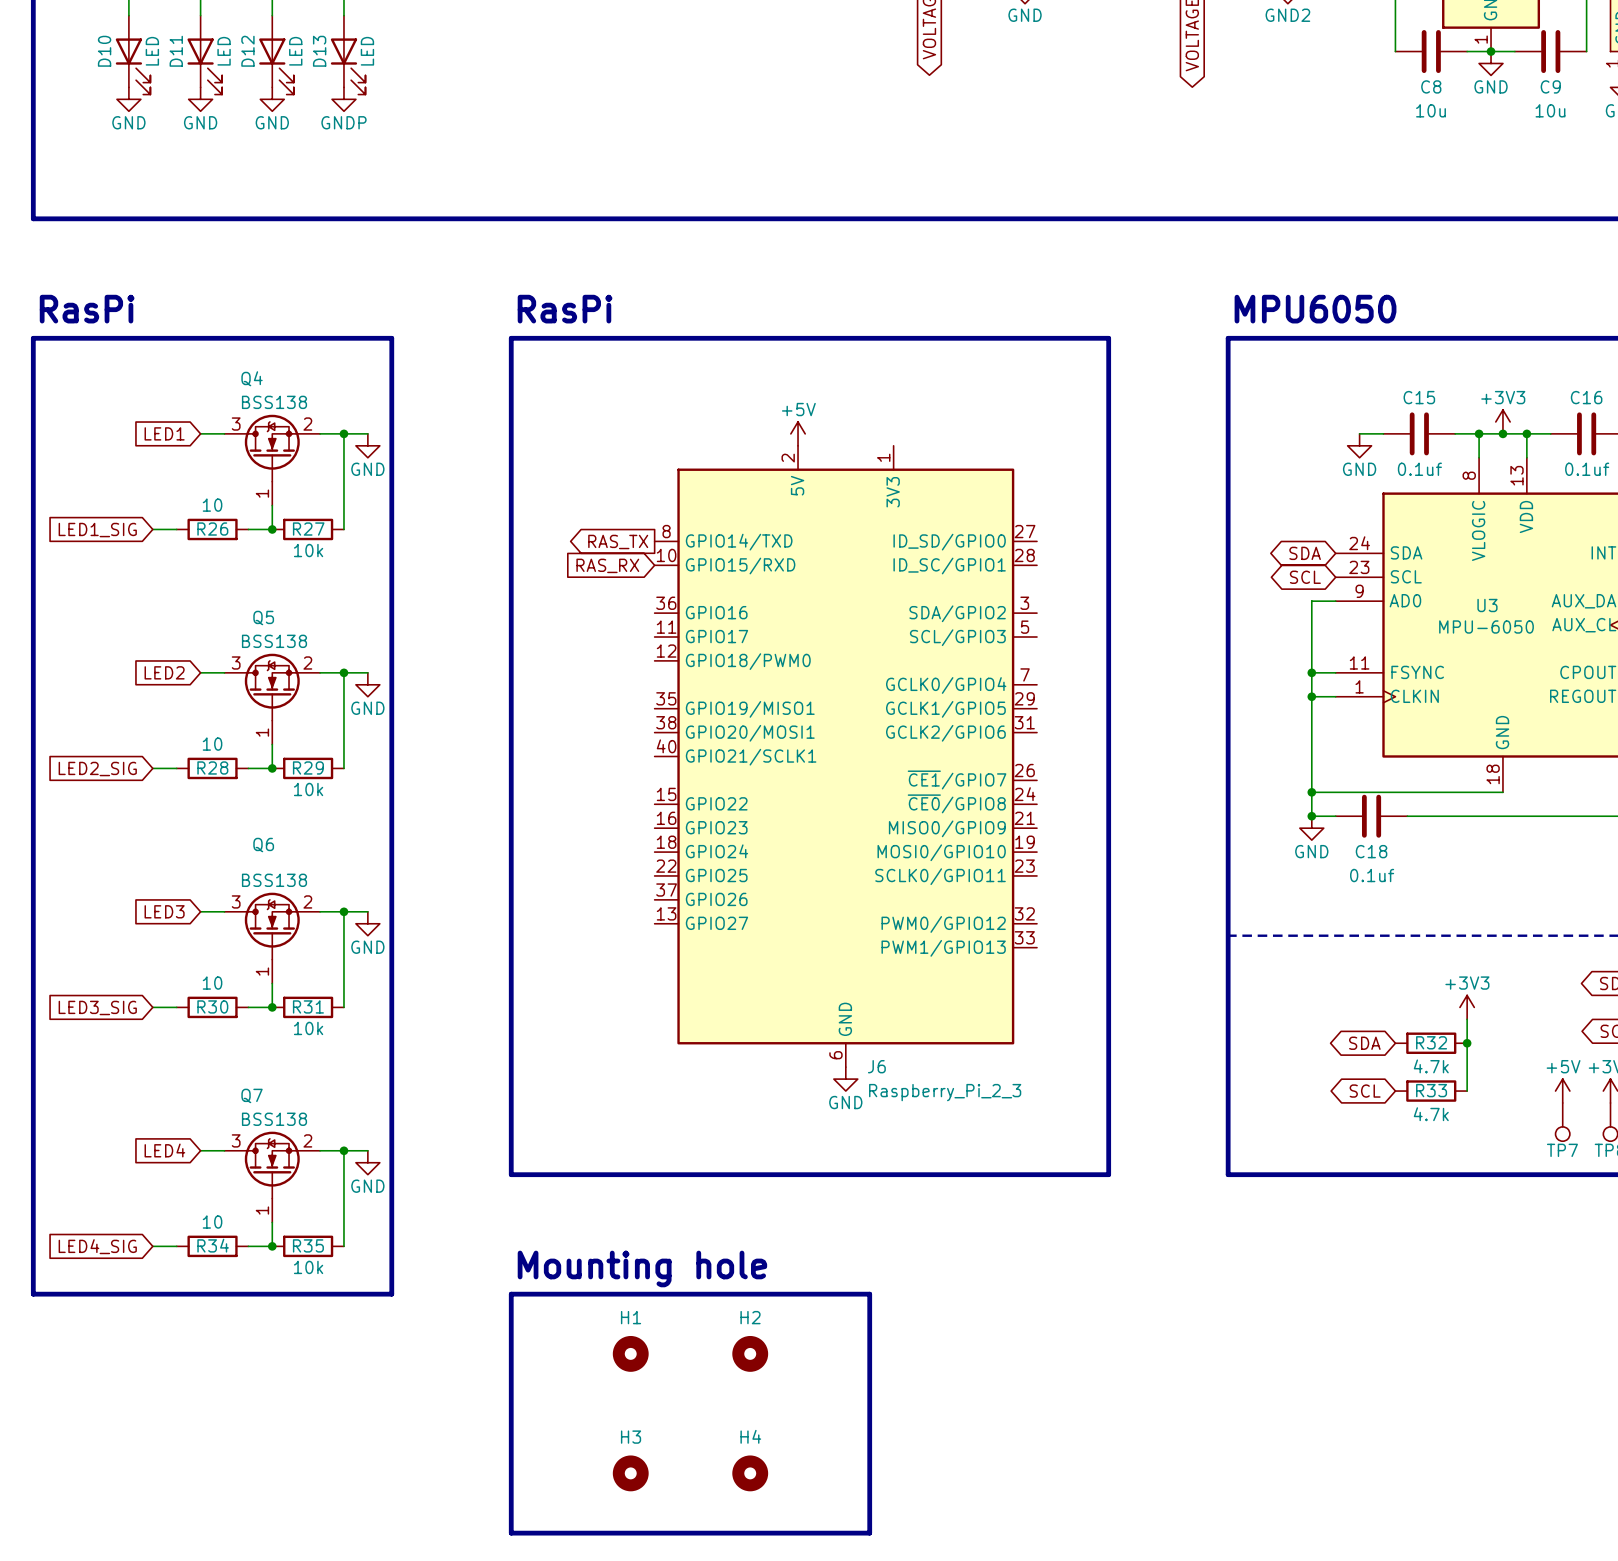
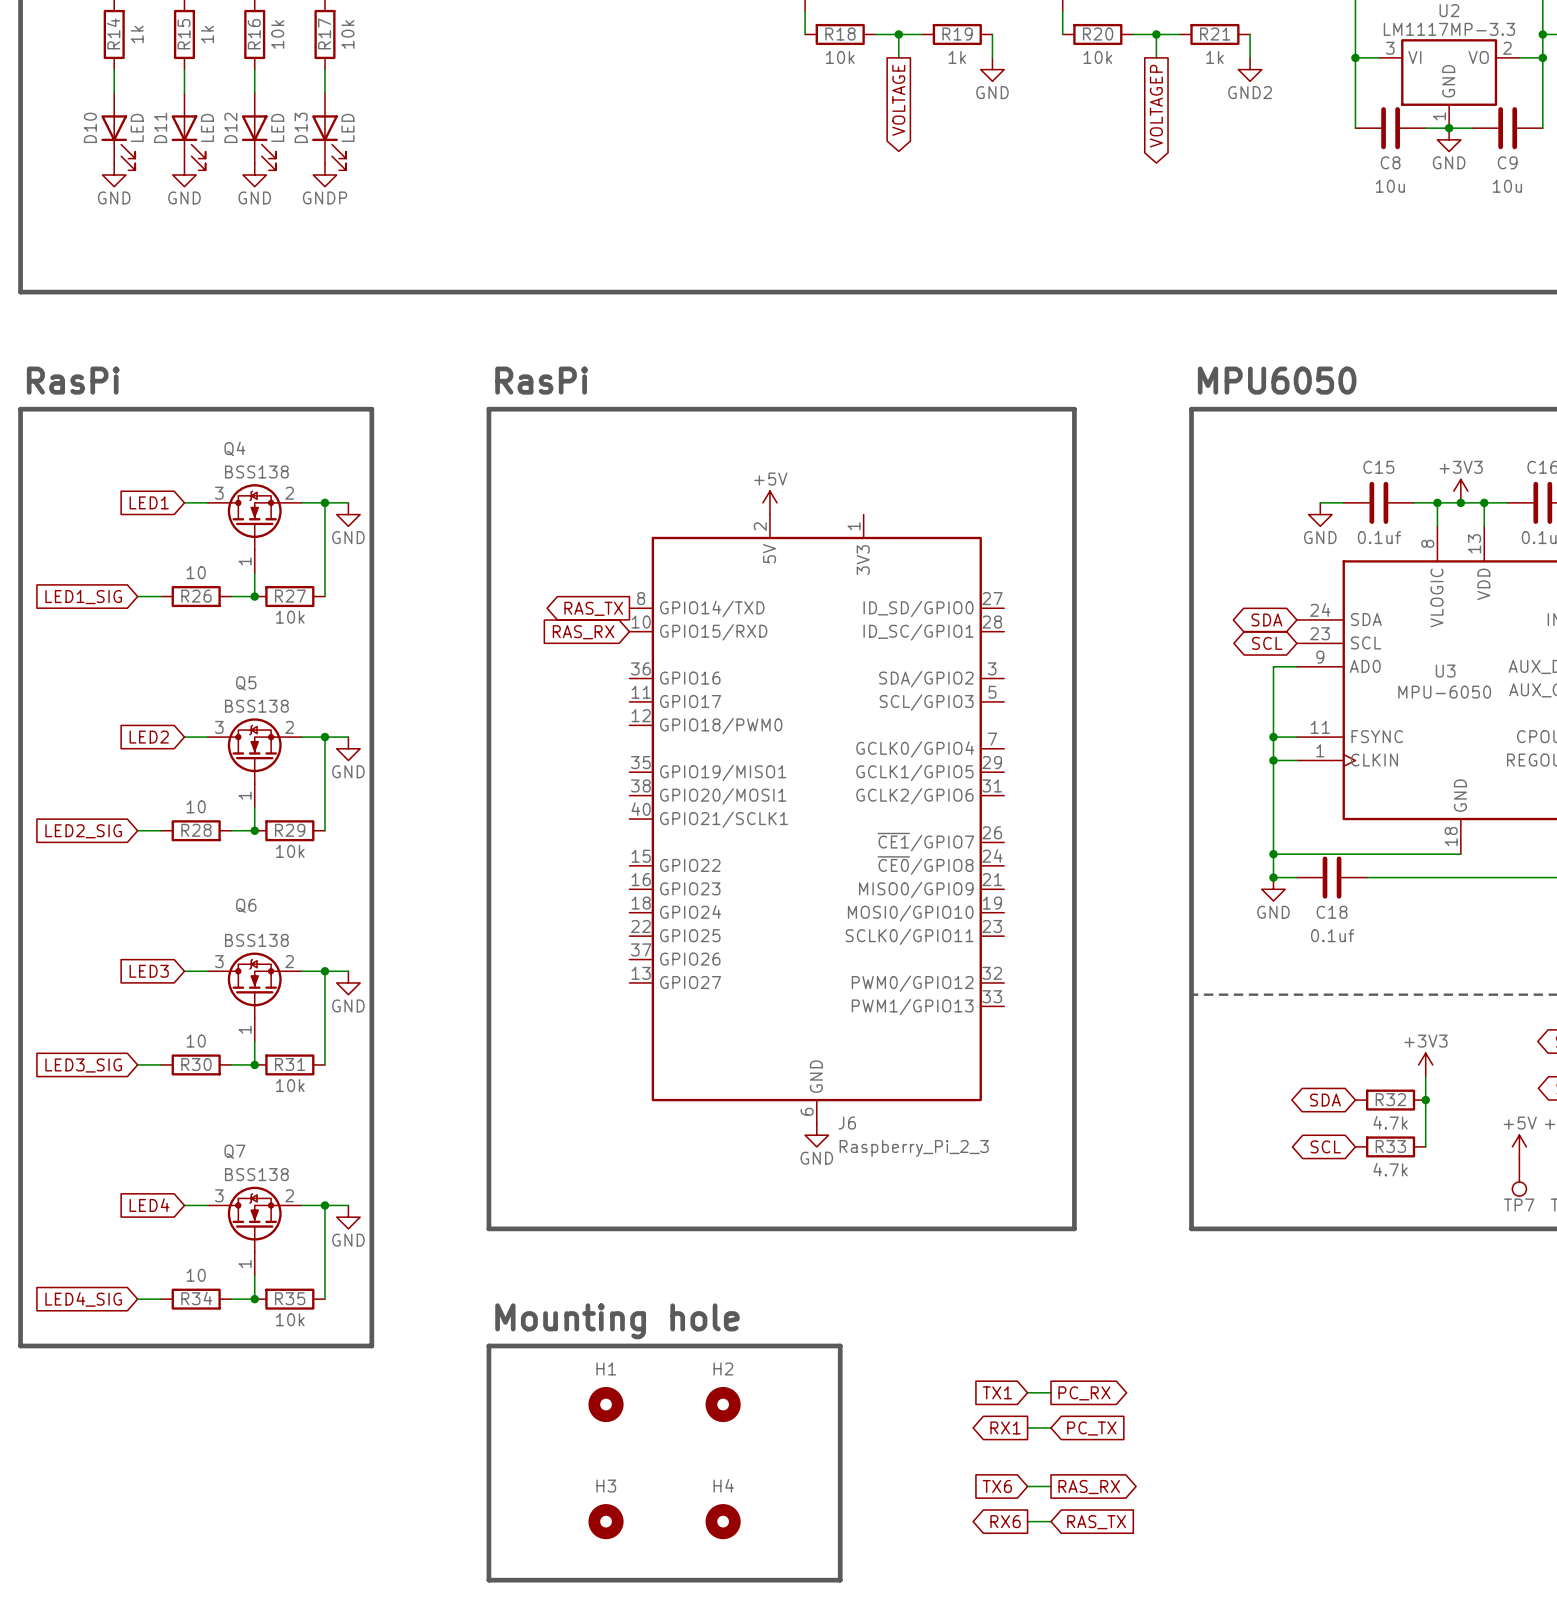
global label: none -> TX1 (997, 1392)
wire: none -> (1027, 1392) (1051, 1392)
global label: none -> PC_RX (1084, 1393)
global label: none -> RX1 (1005, 1427)
wire: none -> (1027, 1427) (1051, 1427)
global label: none -> PC_TX (1091, 1428)
global label: none -> TX6 (997, 1486)
wire: none -> (1027, 1486) (1051, 1486)
global label: none -> RAS_RX (1089, 1487)
global label: none -> RX6 (1005, 1521)
wire: none -> (1027, 1521) (1051, 1521)
global label: none -> RAS_TX (1096, 1522)

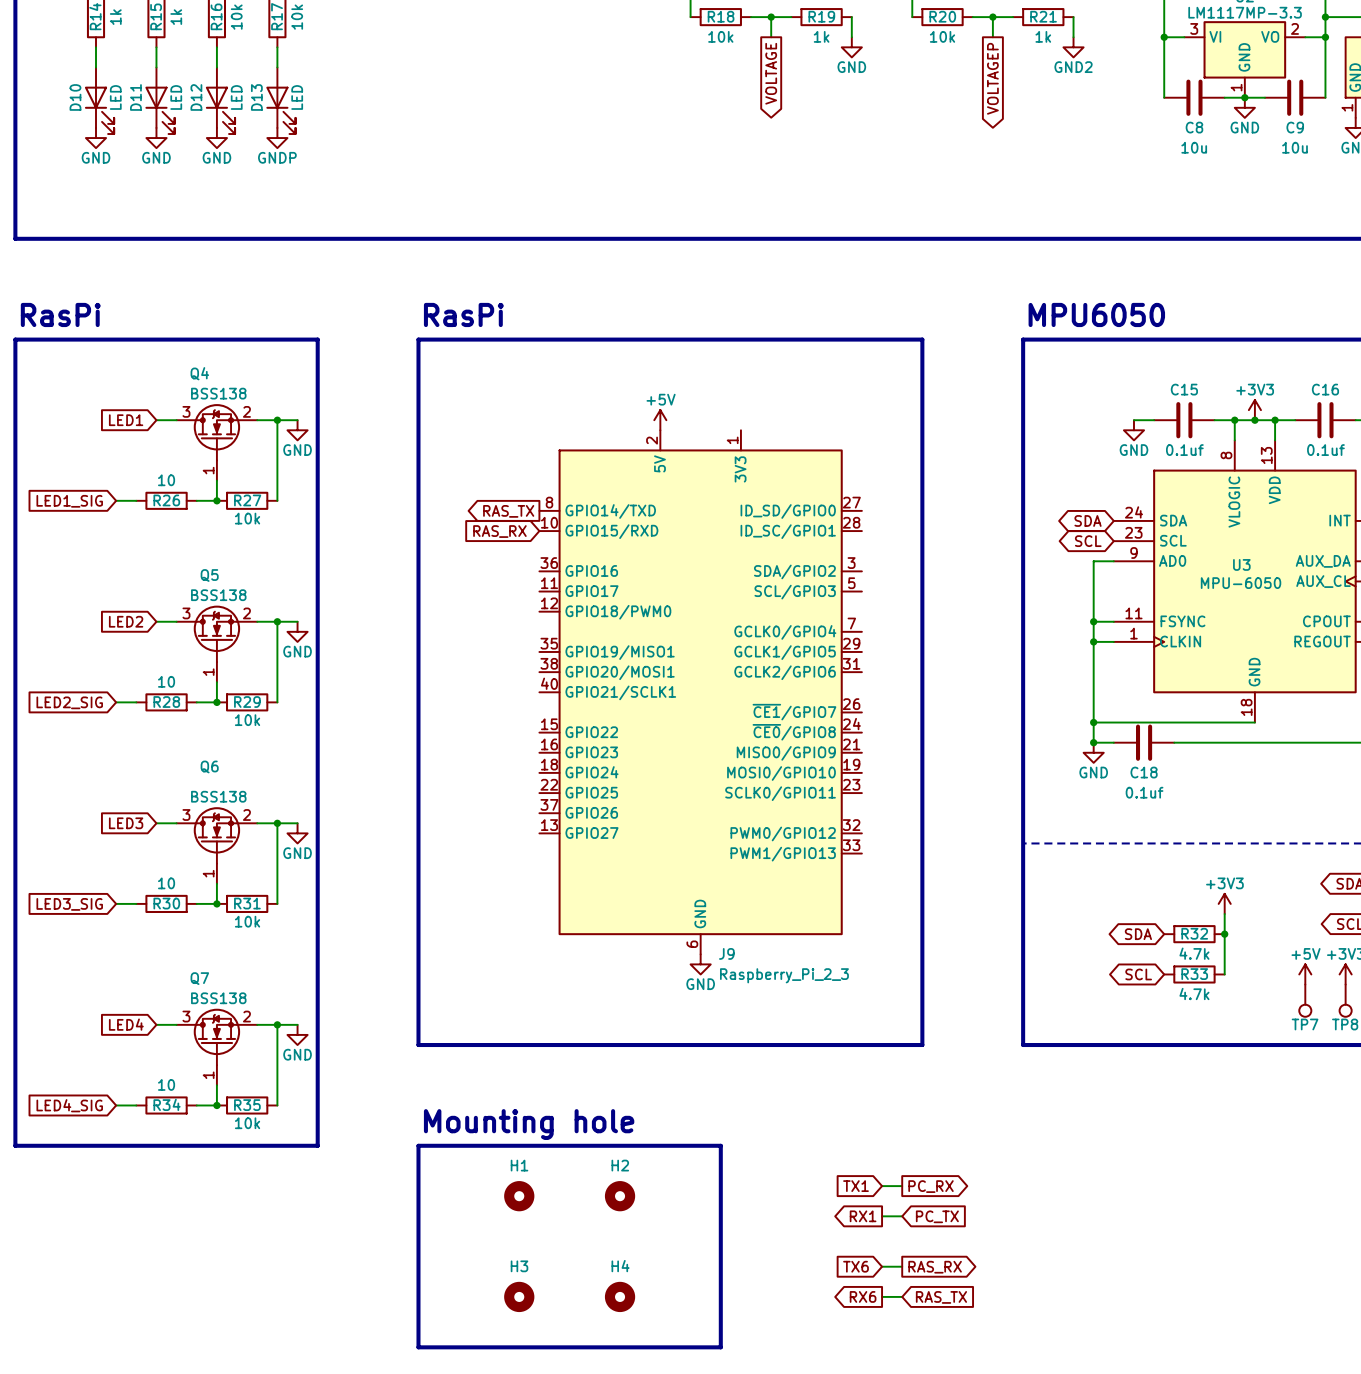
J6 name: J6 (847, 1123) -> J9 (726, 953)

